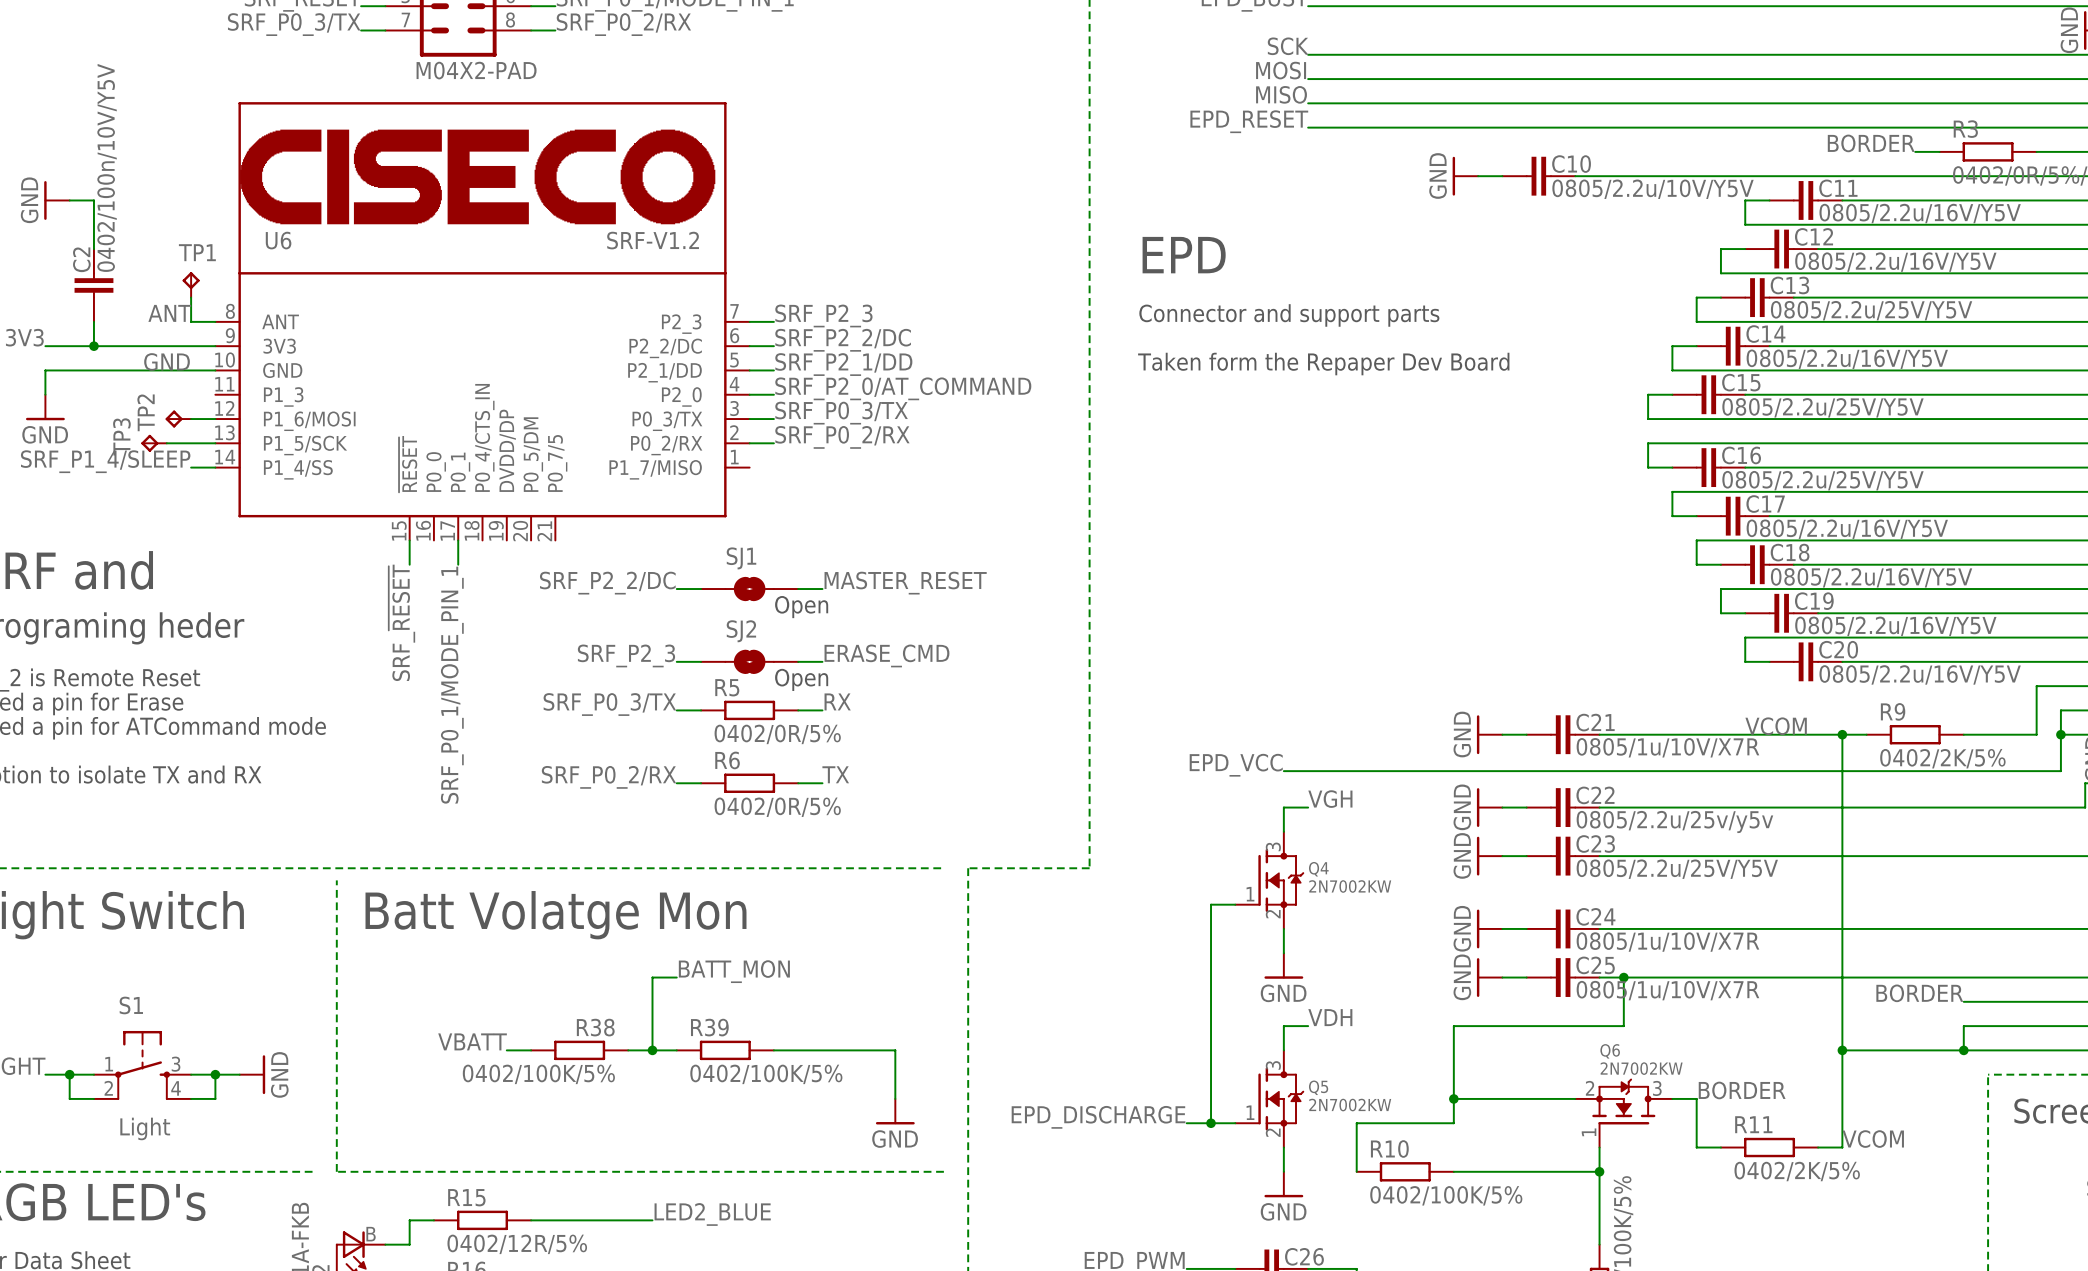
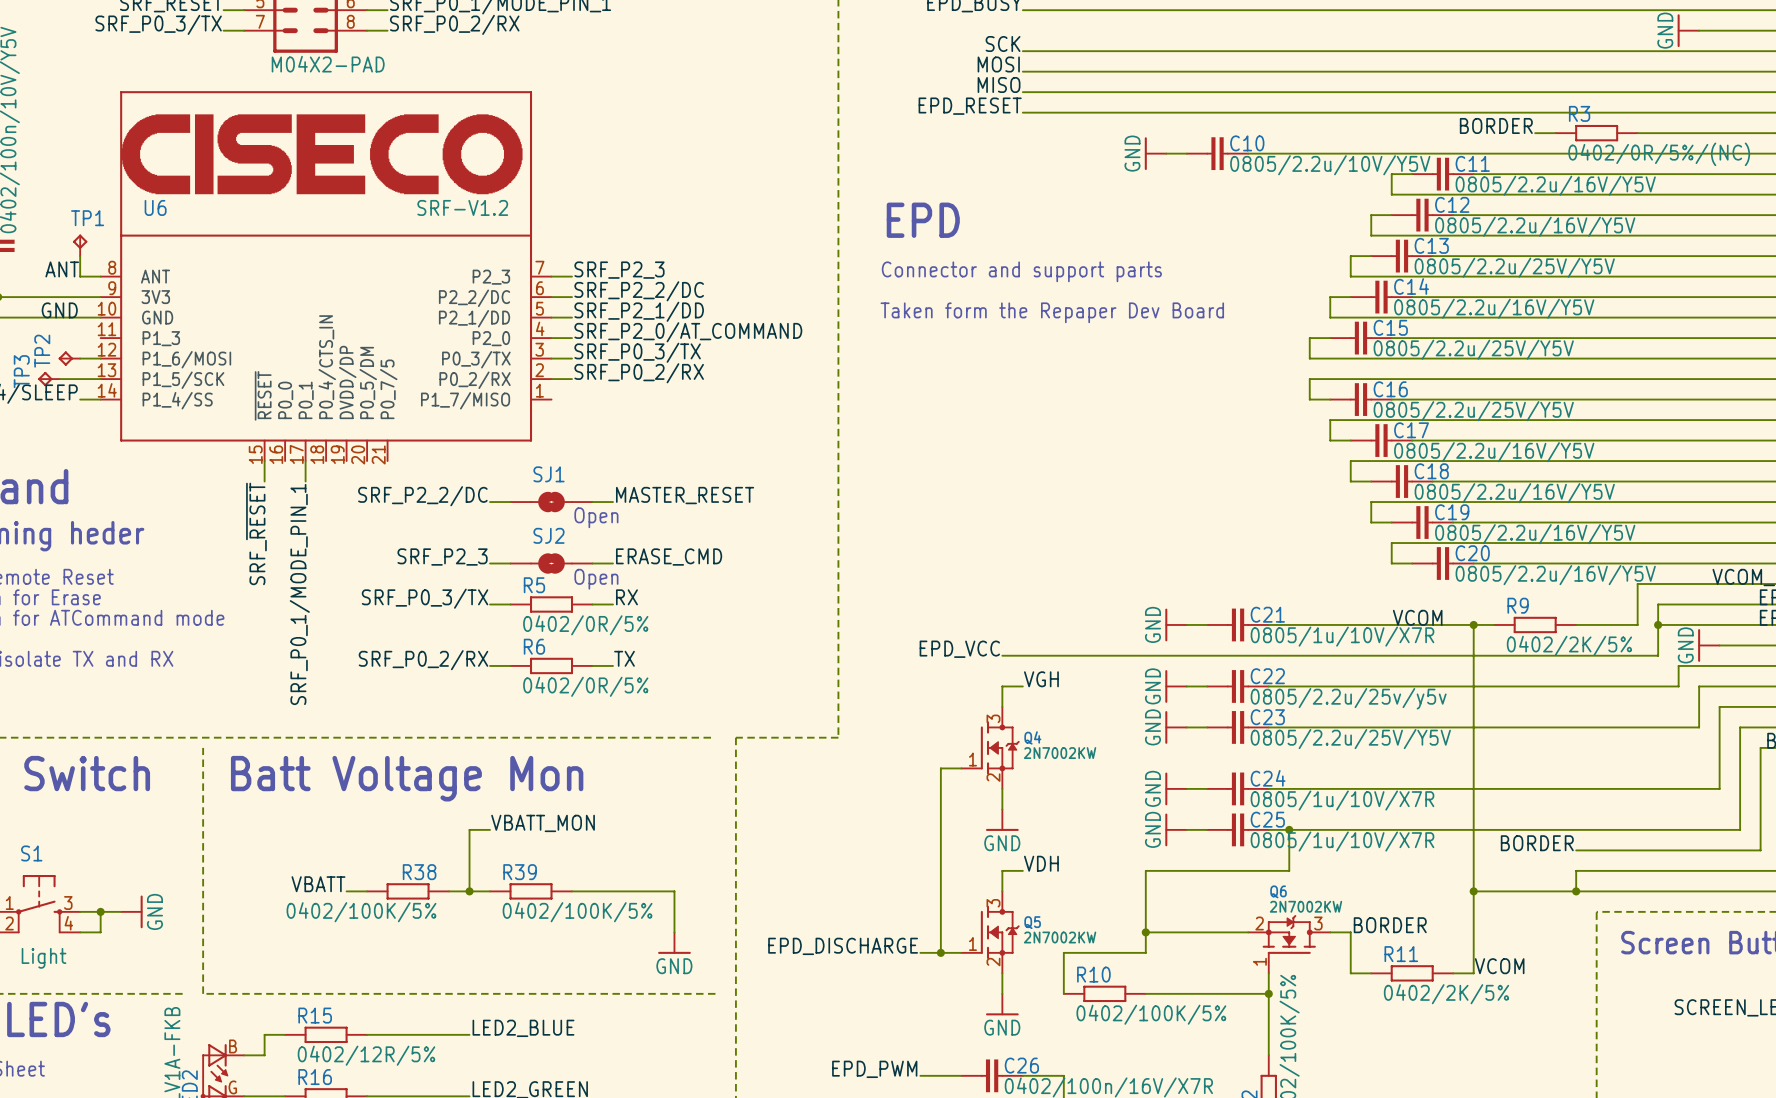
text: Batt Volatge Mon (556, 915) -> Batt Voltage Mon (407, 778)
label: BATT_MON (734, 971) -> VBATT_MON (543, 823)

